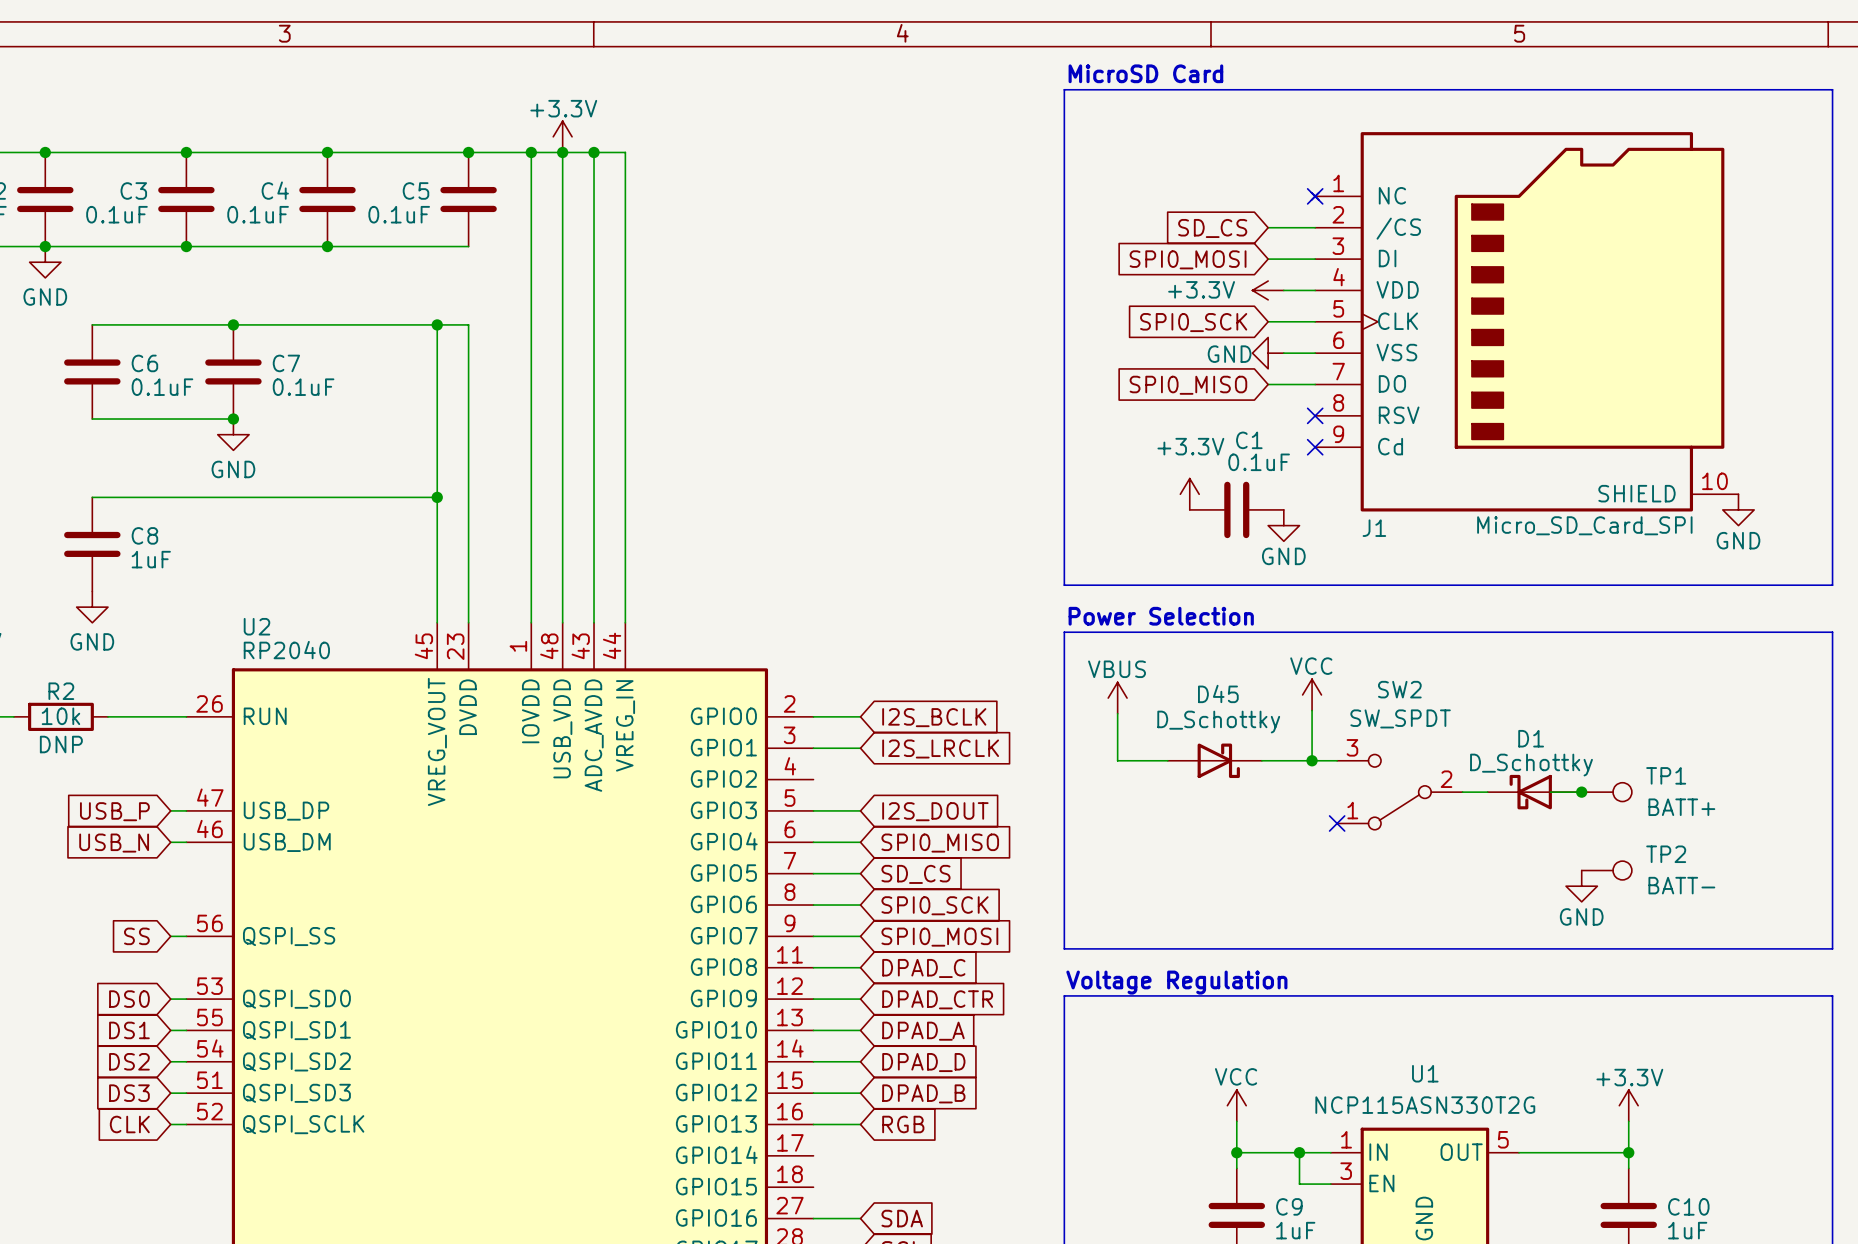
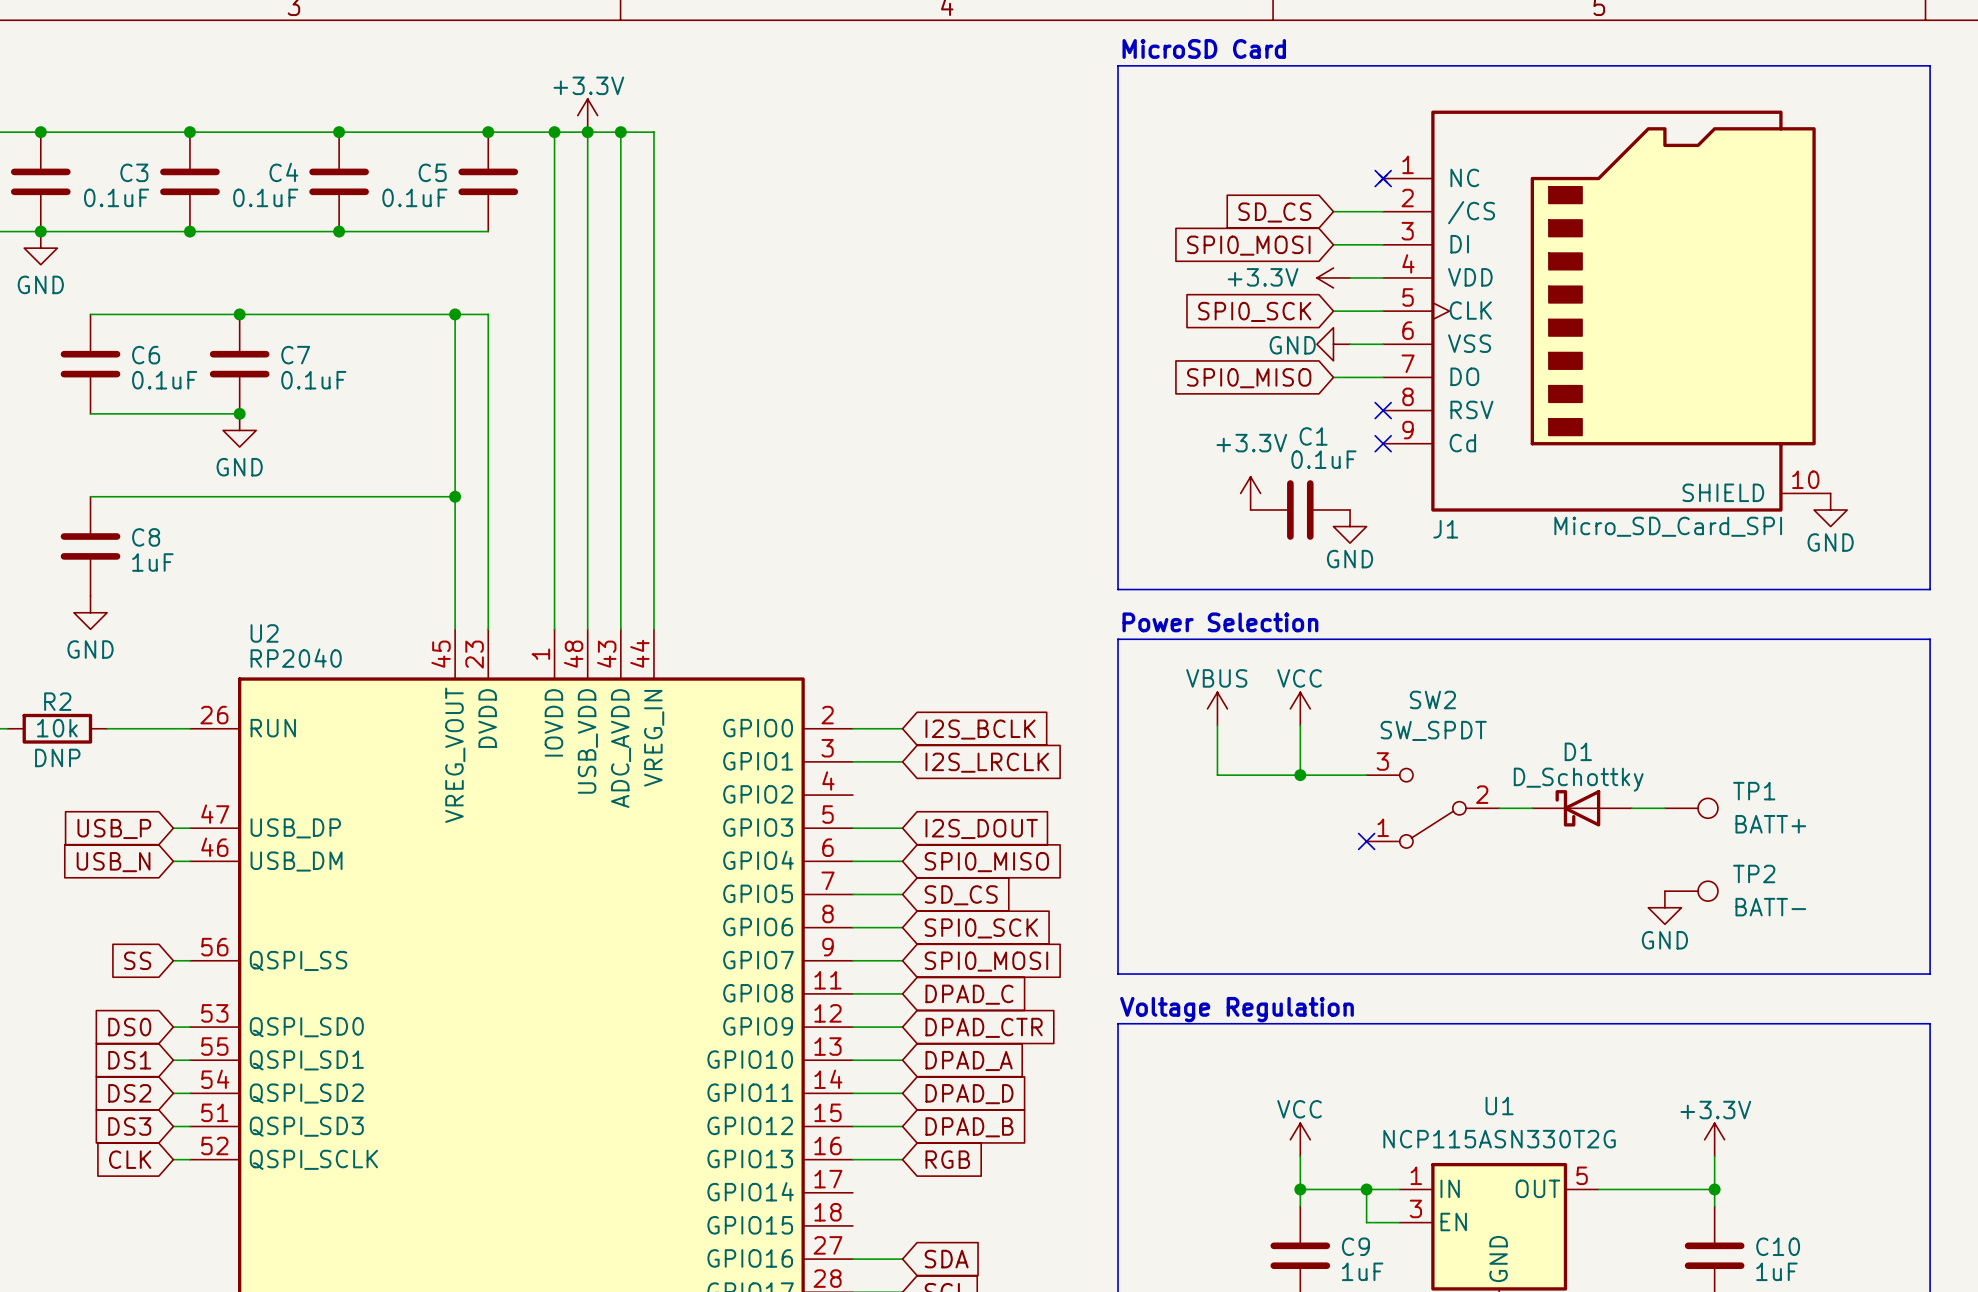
power symbol position: VCC (1312, 694) -> VCC (1300, 708)
power symbol position: VBUS (1117, 698) -> VBUS (1217, 708)
wire: (1312, 710) (1312, 760) -> none
wire: (1117, 713) (1117, 760) (1158, 760) -> (1217, 725) (1217, 775)
wire: none -> (1300, 725) (1300, 775)
D45: D_Schottky (1214, 760) -> none
junction: none -> (1300, 775)
junction: (1312, 760) -> none
SW2 position: (1399, 792) -> (1432, 808)
D1 position: (1534, 792) -> (1582, 808)
junction: (1581, 792) -> none
no-connect mark position: (1337, 823) -> (1366, 841)

